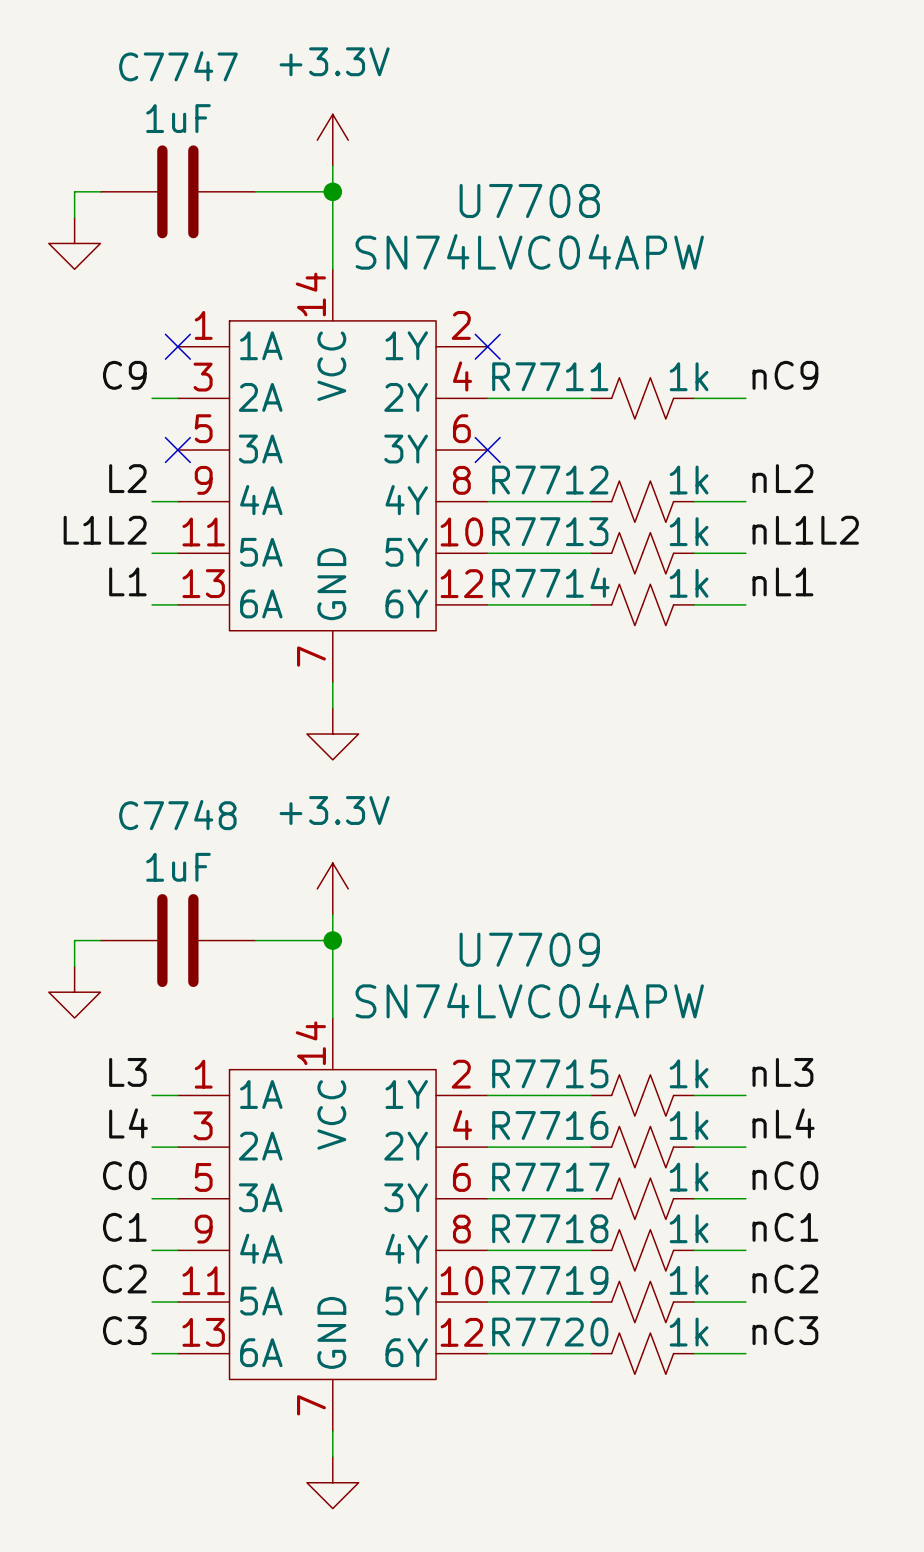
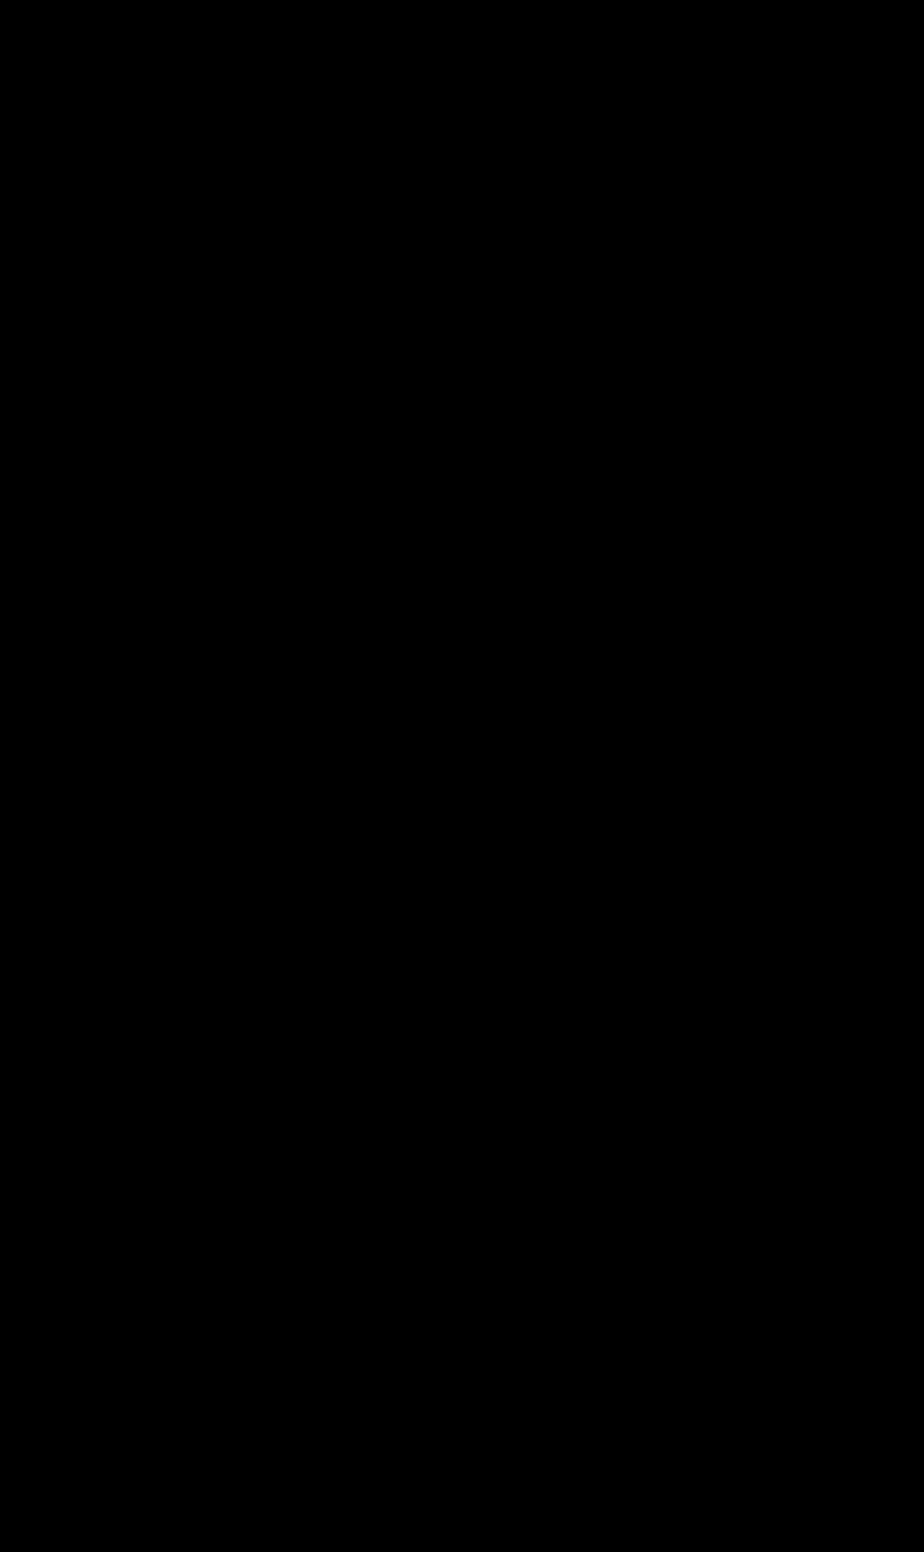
power symbol: +3.3V (332, 140) -> none
wire: (332, 166) (332, 269) -> none
wire: (100, 191) (74, 191) (74, 217) -> none
C7747: 1uF (177, 191) -> none
wire: (255, 191) (332, 191) -> none
junction: (332, 191) -> none
power symbol: (74, 243) -> none
no-connect mark: (177, 346) -> none
no-connect mark: (487, 346) -> none
label: C9 (124, 375) -> none
label: nC9 (785, 375) -> none
wire: (152, 398) (177, 398) -> none
wire: (487, 398) (590, 398) -> none
R7711: 1k (642, 398) -> none
wire: (694, 398) (745, 398) -> none
no-connect mark: (177, 450) -> none
no-connect mark: (487, 450) -> none
U7708: SN74LVC04APW (332, 475) -> none
label: L2 (127, 478) -> none
label: nL2 (782, 478) -> none
wire: (152, 501) (177, 501) -> none
wire: (487, 501) (590, 501) -> none
R7712: 1k (642, 501) -> none
wire: (694, 501) (745, 501) -> none
label: L1L2 (105, 530) -> none
label: nL1L2 (805, 530) -> none
wire: (152, 553) (177, 553) -> none
wire: (487, 553) (590, 553) -> none
R7713: 1k (642, 553) -> none
wire: (694, 553) (745, 553) -> none
label: L1 (127, 581) -> none
label: nL1 (782, 581) -> none
wire: (152, 604) (177, 604) -> none
wire: (487, 604) (590, 604) -> none
R7714: 1k (642, 604) -> none
wire: (694, 604) (745, 604) -> none
wire: (332, 682) (332, 708) -> none
power symbol: (332, 734) -> none
power symbol: +3.3V (332, 888) -> none
wire: (332, 914) (332, 1018) -> none
wire: (100, 940) (74, 940) (74, 966) -> none
C7748: 1uF (177, 940) -> none
wire: (255, 940) (332, 940) -> none
junction: (332, 940) -> none
power symbol: (74, 992) -> none
label: L3 (127, 1072) -> none
label: nL3 (782, 1072) -> none
wire: (152, 1095) (177, 1095) -> none
wire: (487, 1095) (590, 1095) -> none
R7715: 1k (642, 1095) -> none
wire: (694, 1095) (745, 1095) -> none
label: L4 (128, 1123) -> none
label: nL4 (783, 1123) -> none
wire: (152, 1147) (177, 1147) -> none
wire: (487, 1147) (590, 1147) -> none
R7716: 1k (642, 1147) -> none
wire: (694, 1147) (745, 1147) -> none
label: C0 (124, 1175) -> none
label: nC0 (785, 1175) -> none
wire: (152, 1198) (177, 1198) -> none
wire: (487, 1198) (590, 1198) -> none
R7717: 1k (642, 1198) -> none
wire: (694, 1198) (745, 1198) -> none
U7709: SN74LVC04APW (332, 1224) -> none
label: C1 (124, 1227) -> none
label: nC1 (785, 1227) -> none
wire: (152, 1250) (177, 1250) -> none
wire: (487, 1250) (590, 1250) -> none
R7718: 1k (642, 1250) -> none
wire: (694, 1250) (745, 1250) -> none
label: C2 (124, 1278) -> none
label: nC2 (785, 1278) -> none
wire: (152, 1302) (177, 1302) -> none
wire: (487, 1302) (590, 1302) -> none
R7719: 1k (642, 1302) -> none
wire: (694, 1302) (745, 1302) -> none
label: C3 (124, 1330) -> none
label: nC3 (785, 1330) -> none
wire: (152, 1353) (177, 1353) -> none
wire: (487, 1353) (590, 1353) -> none
R7720: 1k (642, 1353) -> none
wire: (694, 1353) (745, 1353) -> none
wire: (332, 1431) (332, 1456) -> none
power symbol: (332, 1482) -> none

